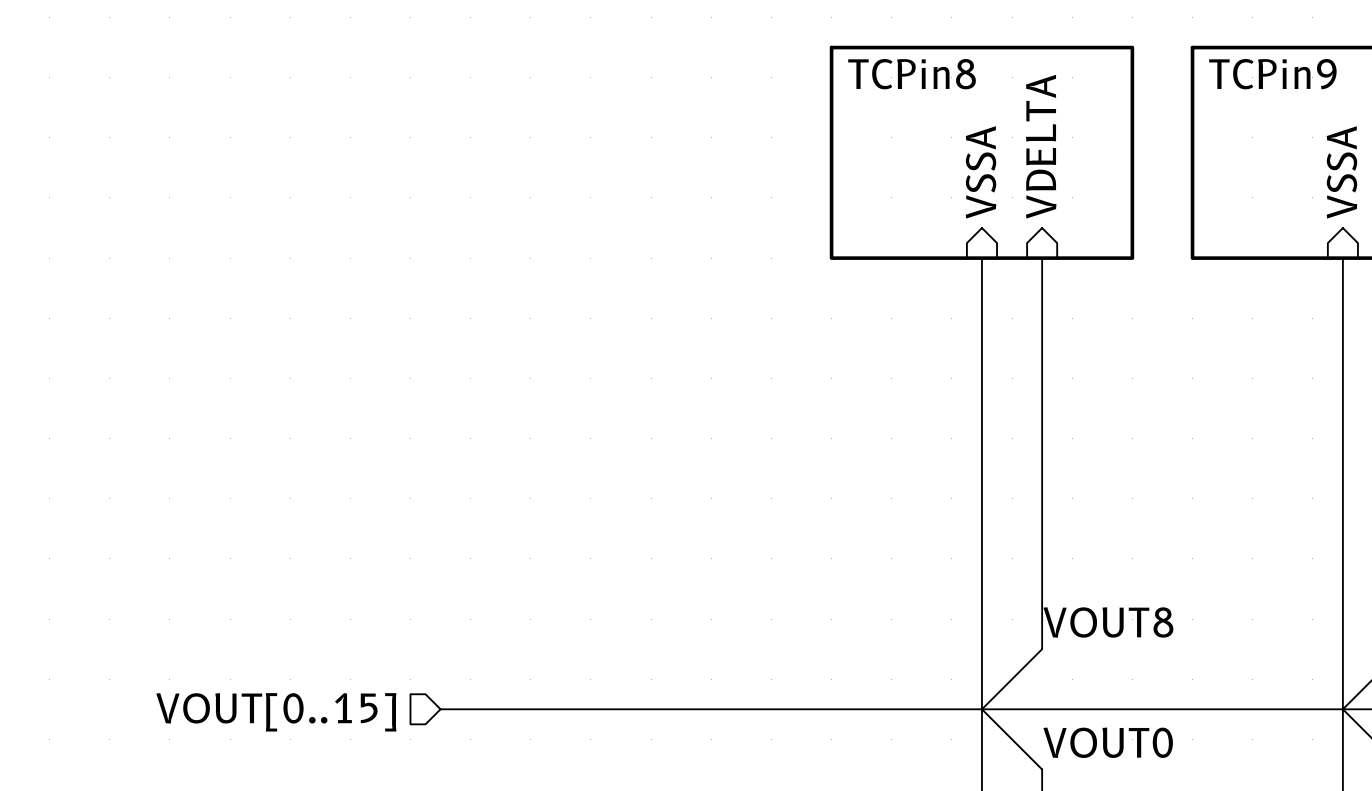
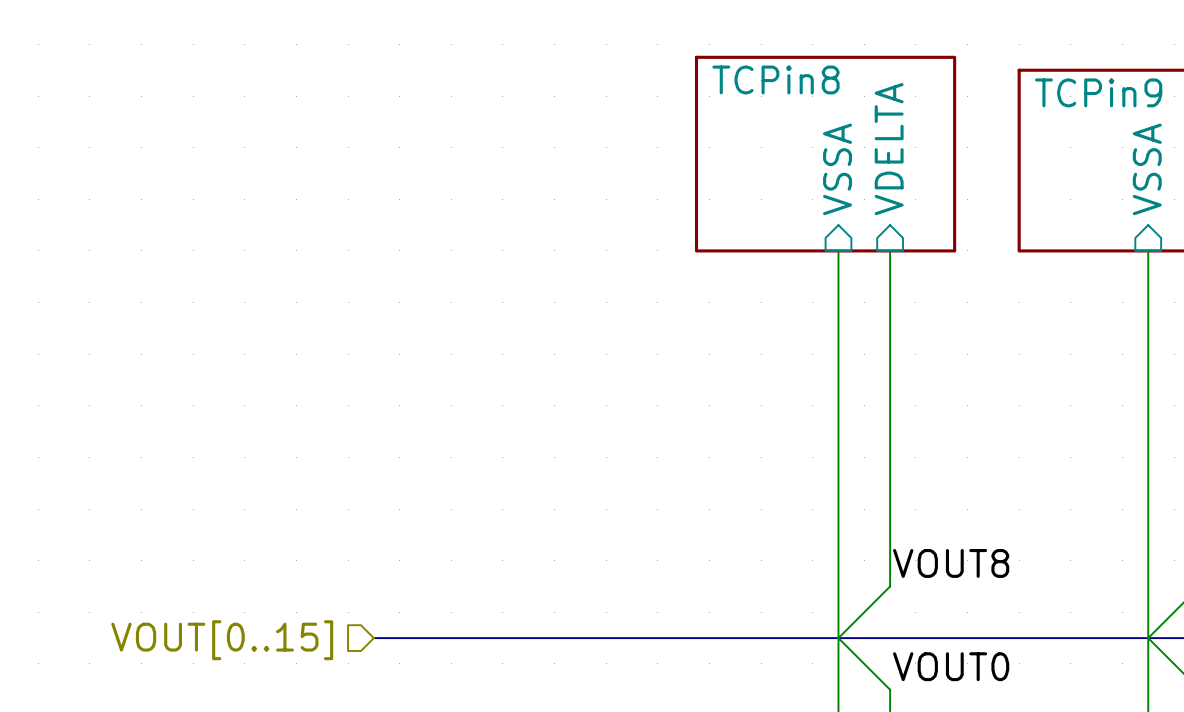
sheet TCPin8 shape: [829, 45, 1135, 260] -> [694, 55, 957, 253]
sheet TCPin8 name position: TCPin8 (912, 74) -> TCPin8 (775, 79)

